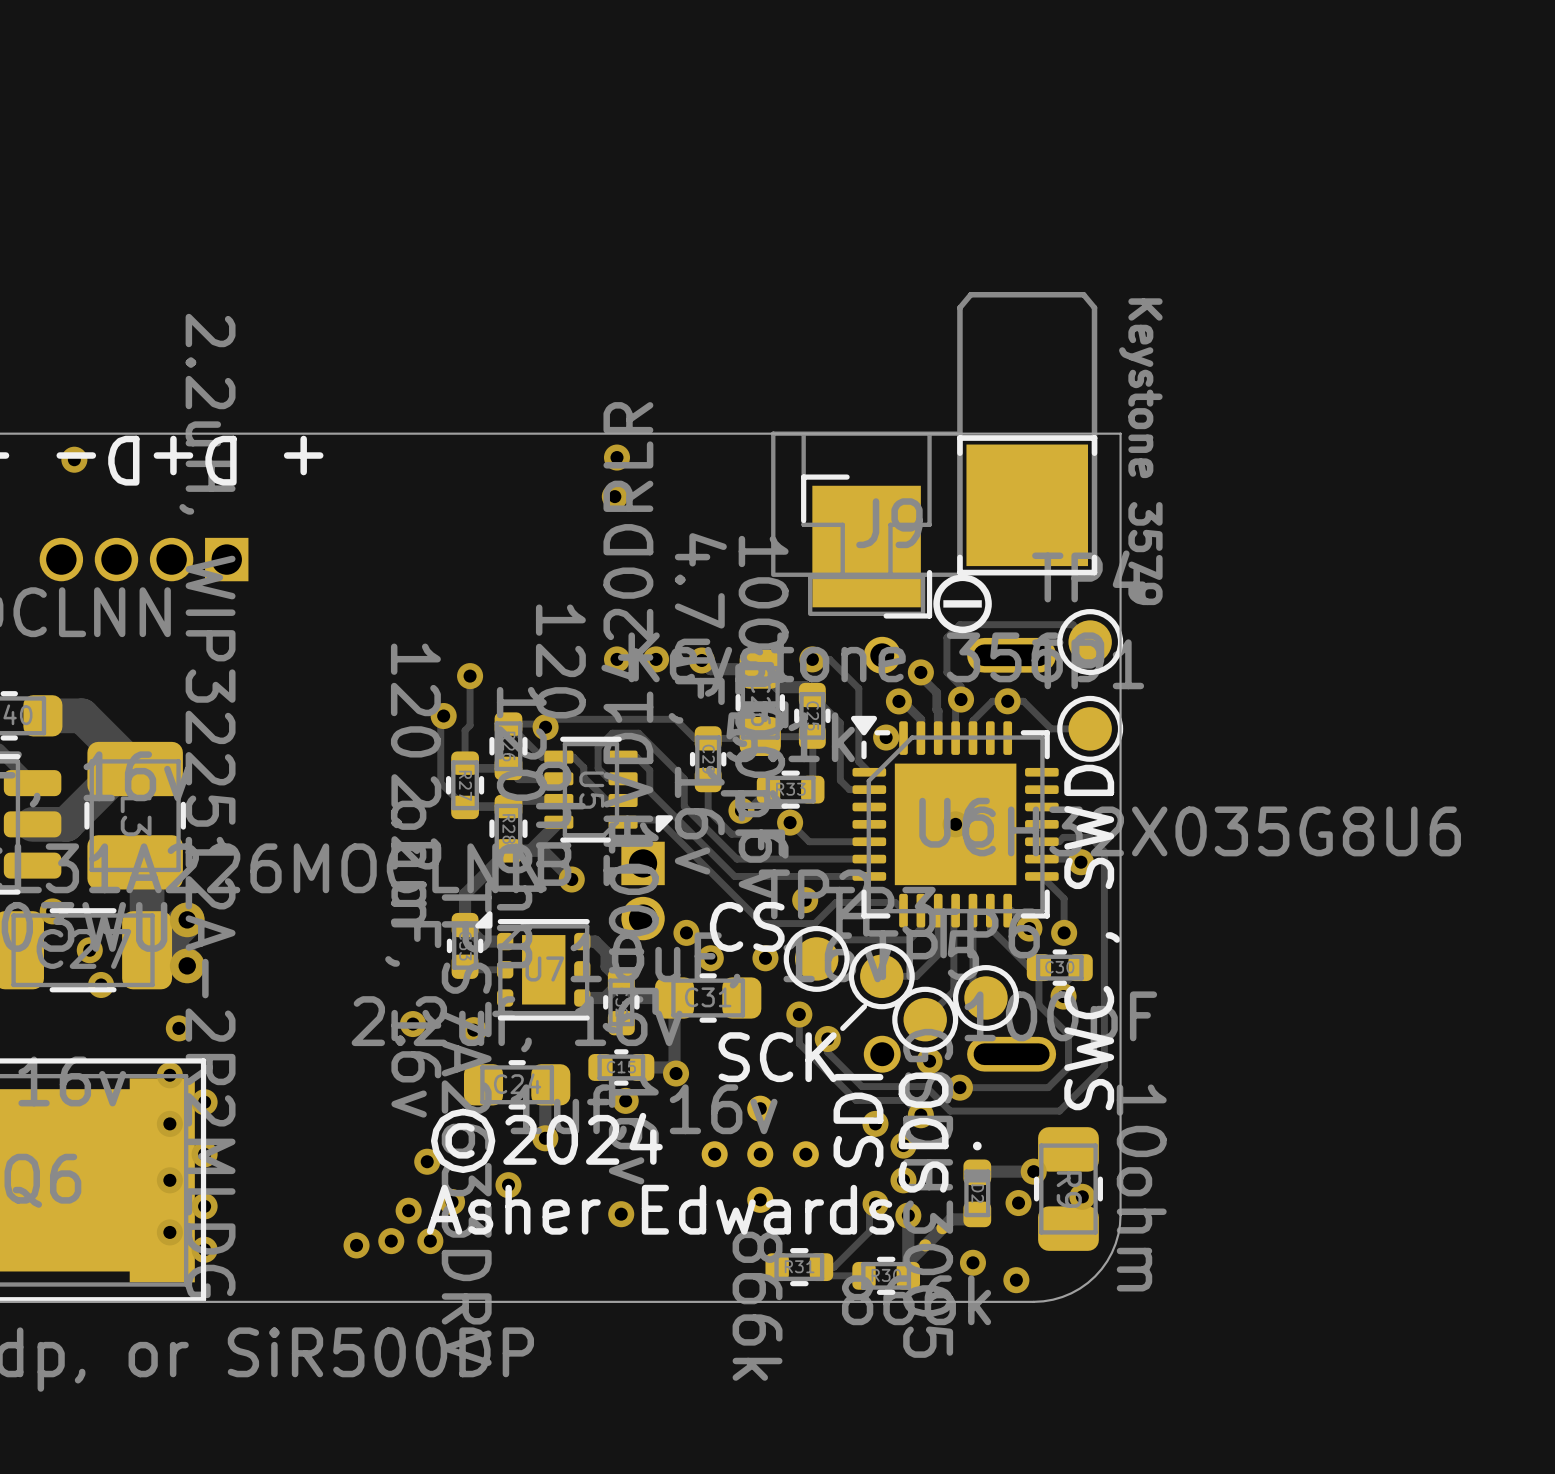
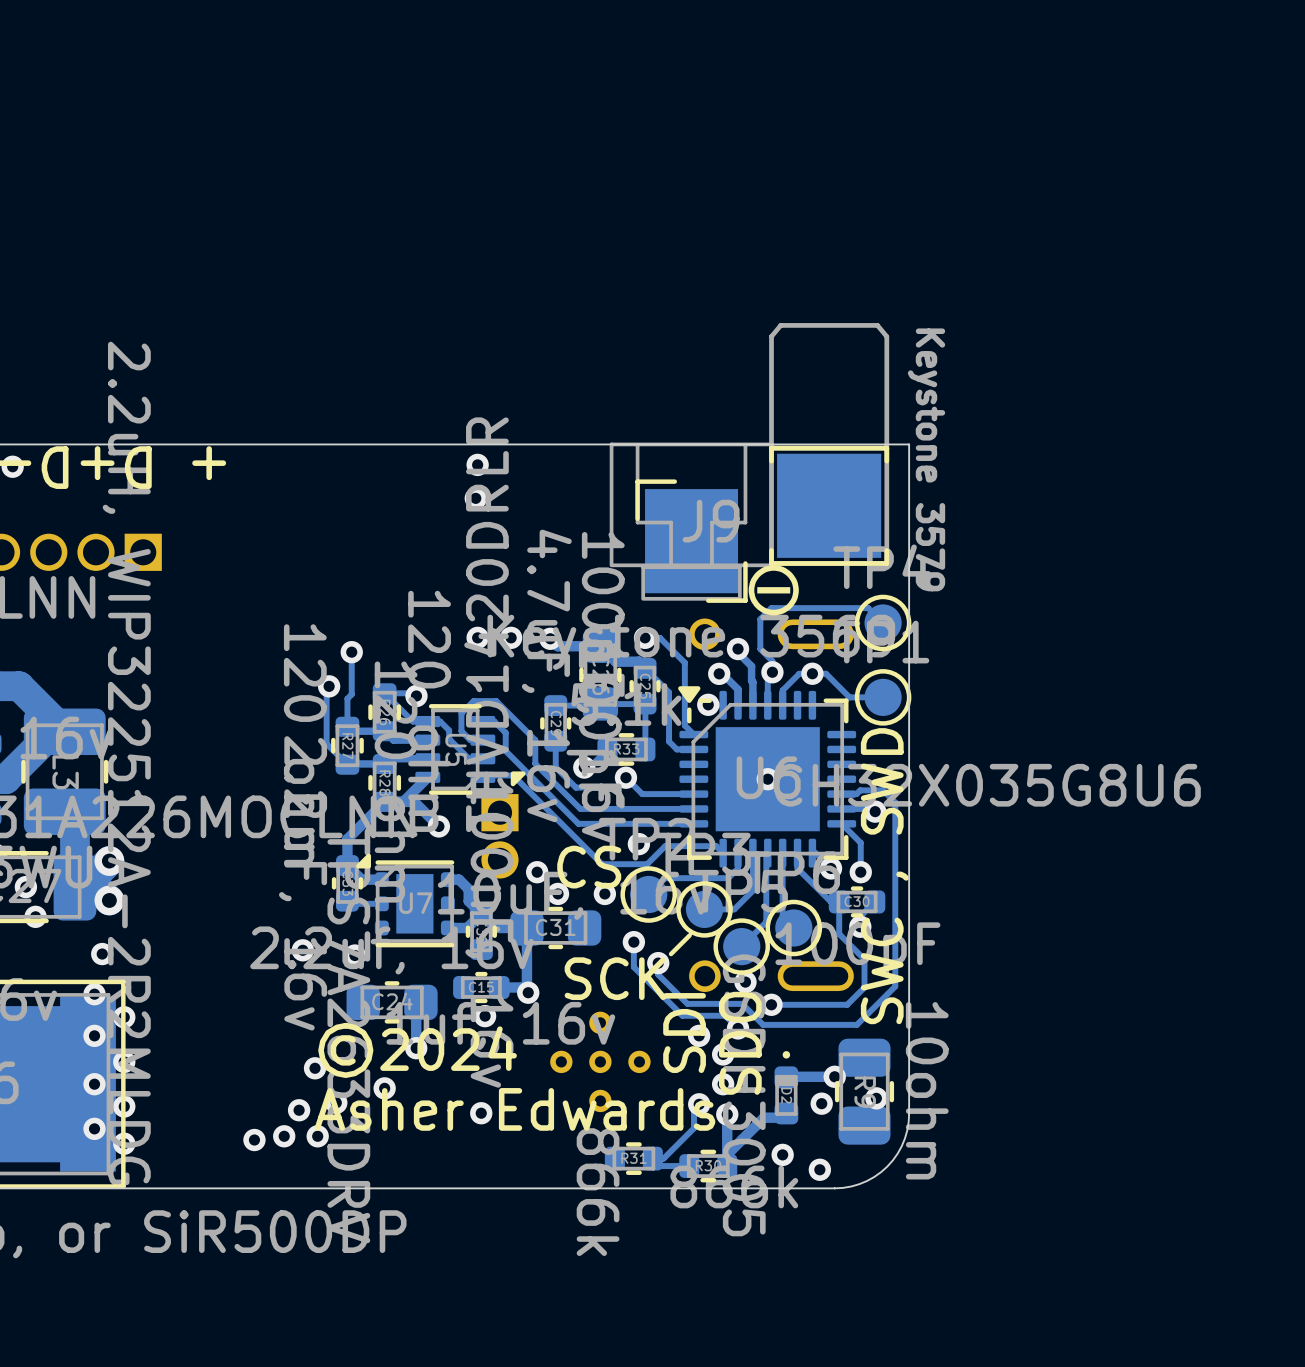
track: (545, 727) (553, 719) (675, 719) (694, 738) (708, 738) -> none

